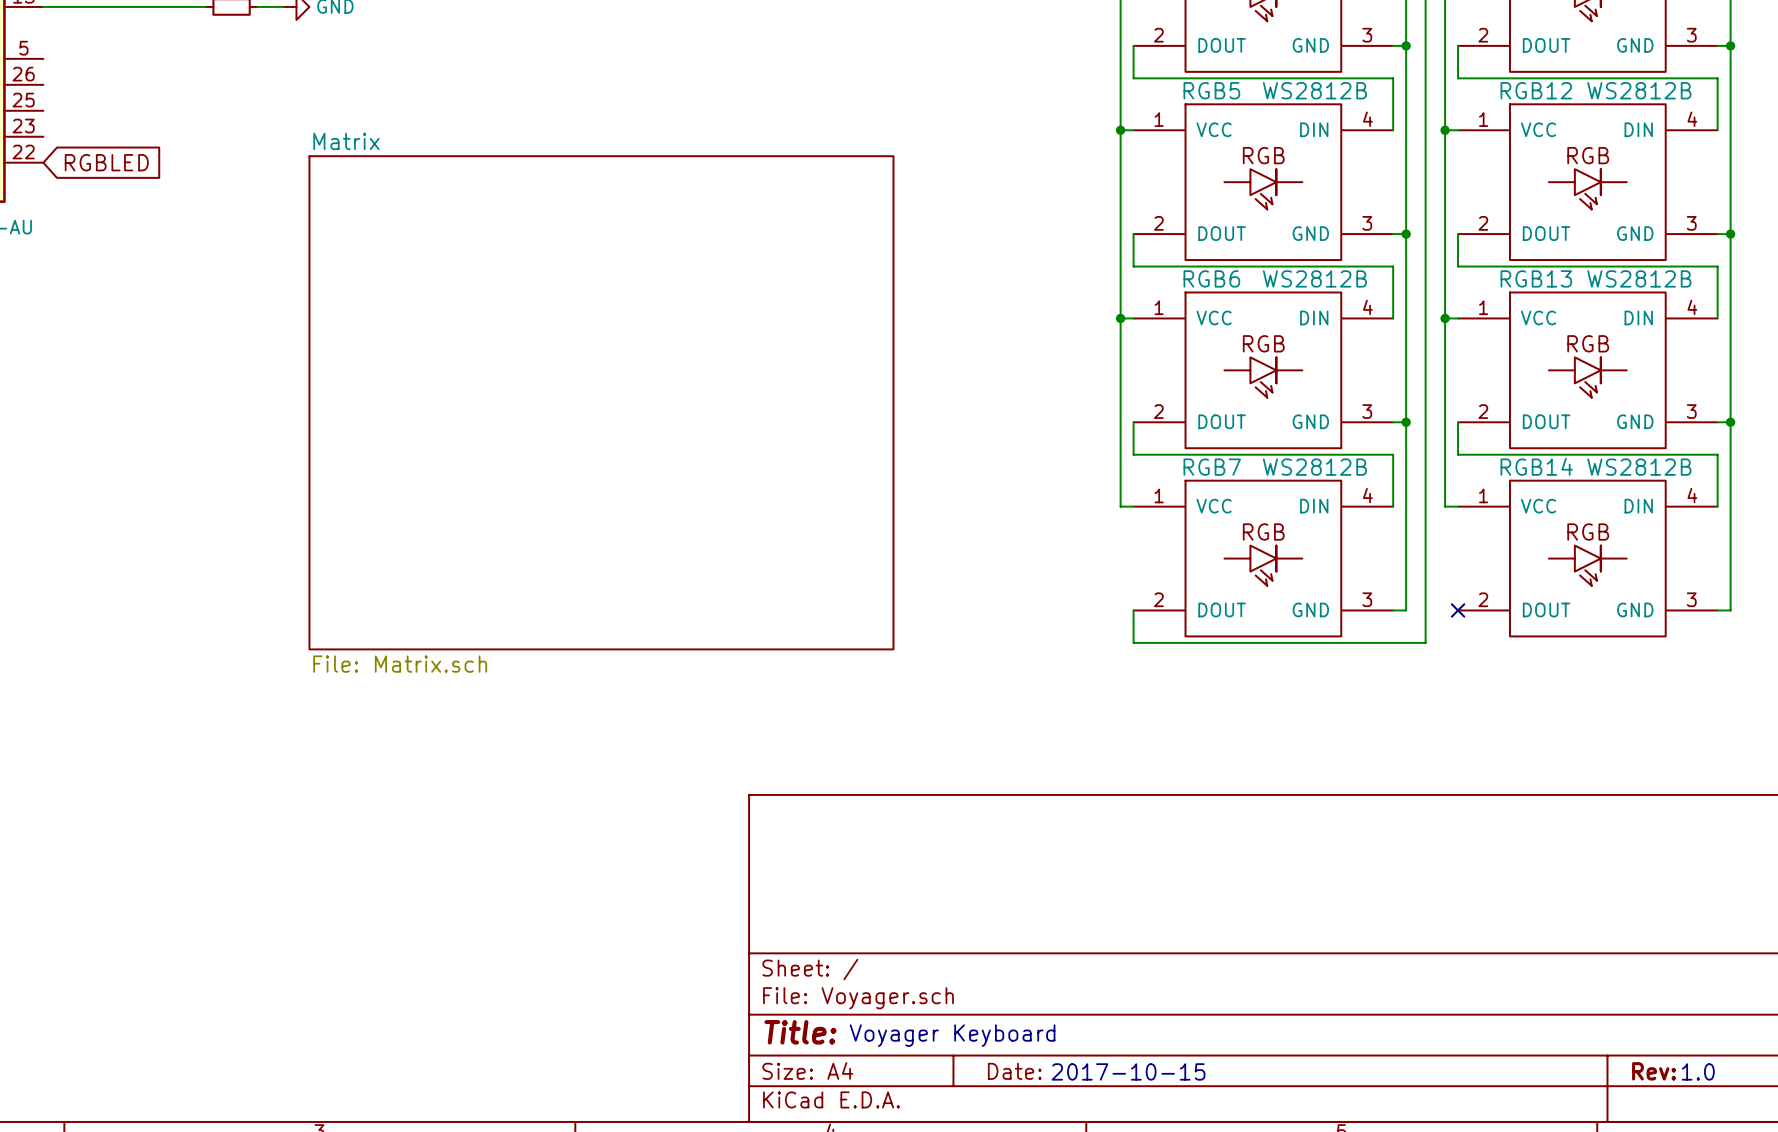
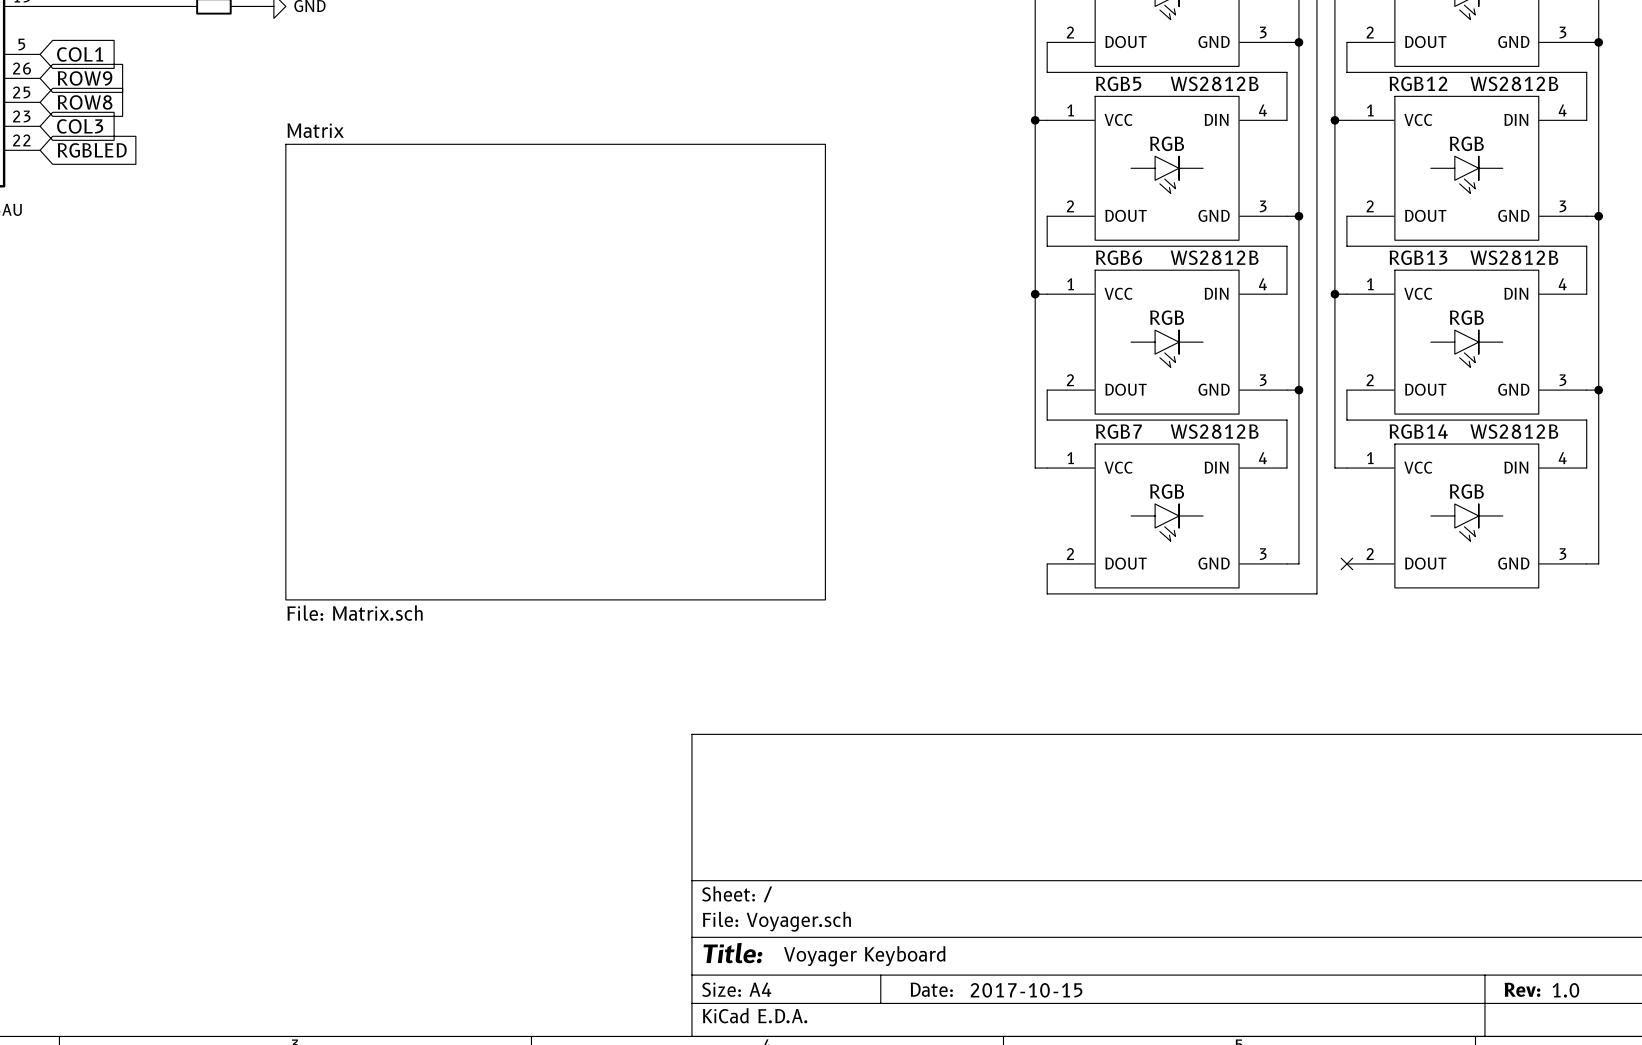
global label: none -> COL1 (80, 54)
global label: none -> ROW9 (85, 78)
global label: none -> ROW8 (85, 102)
global label: none -> COL3 (80, 126)

